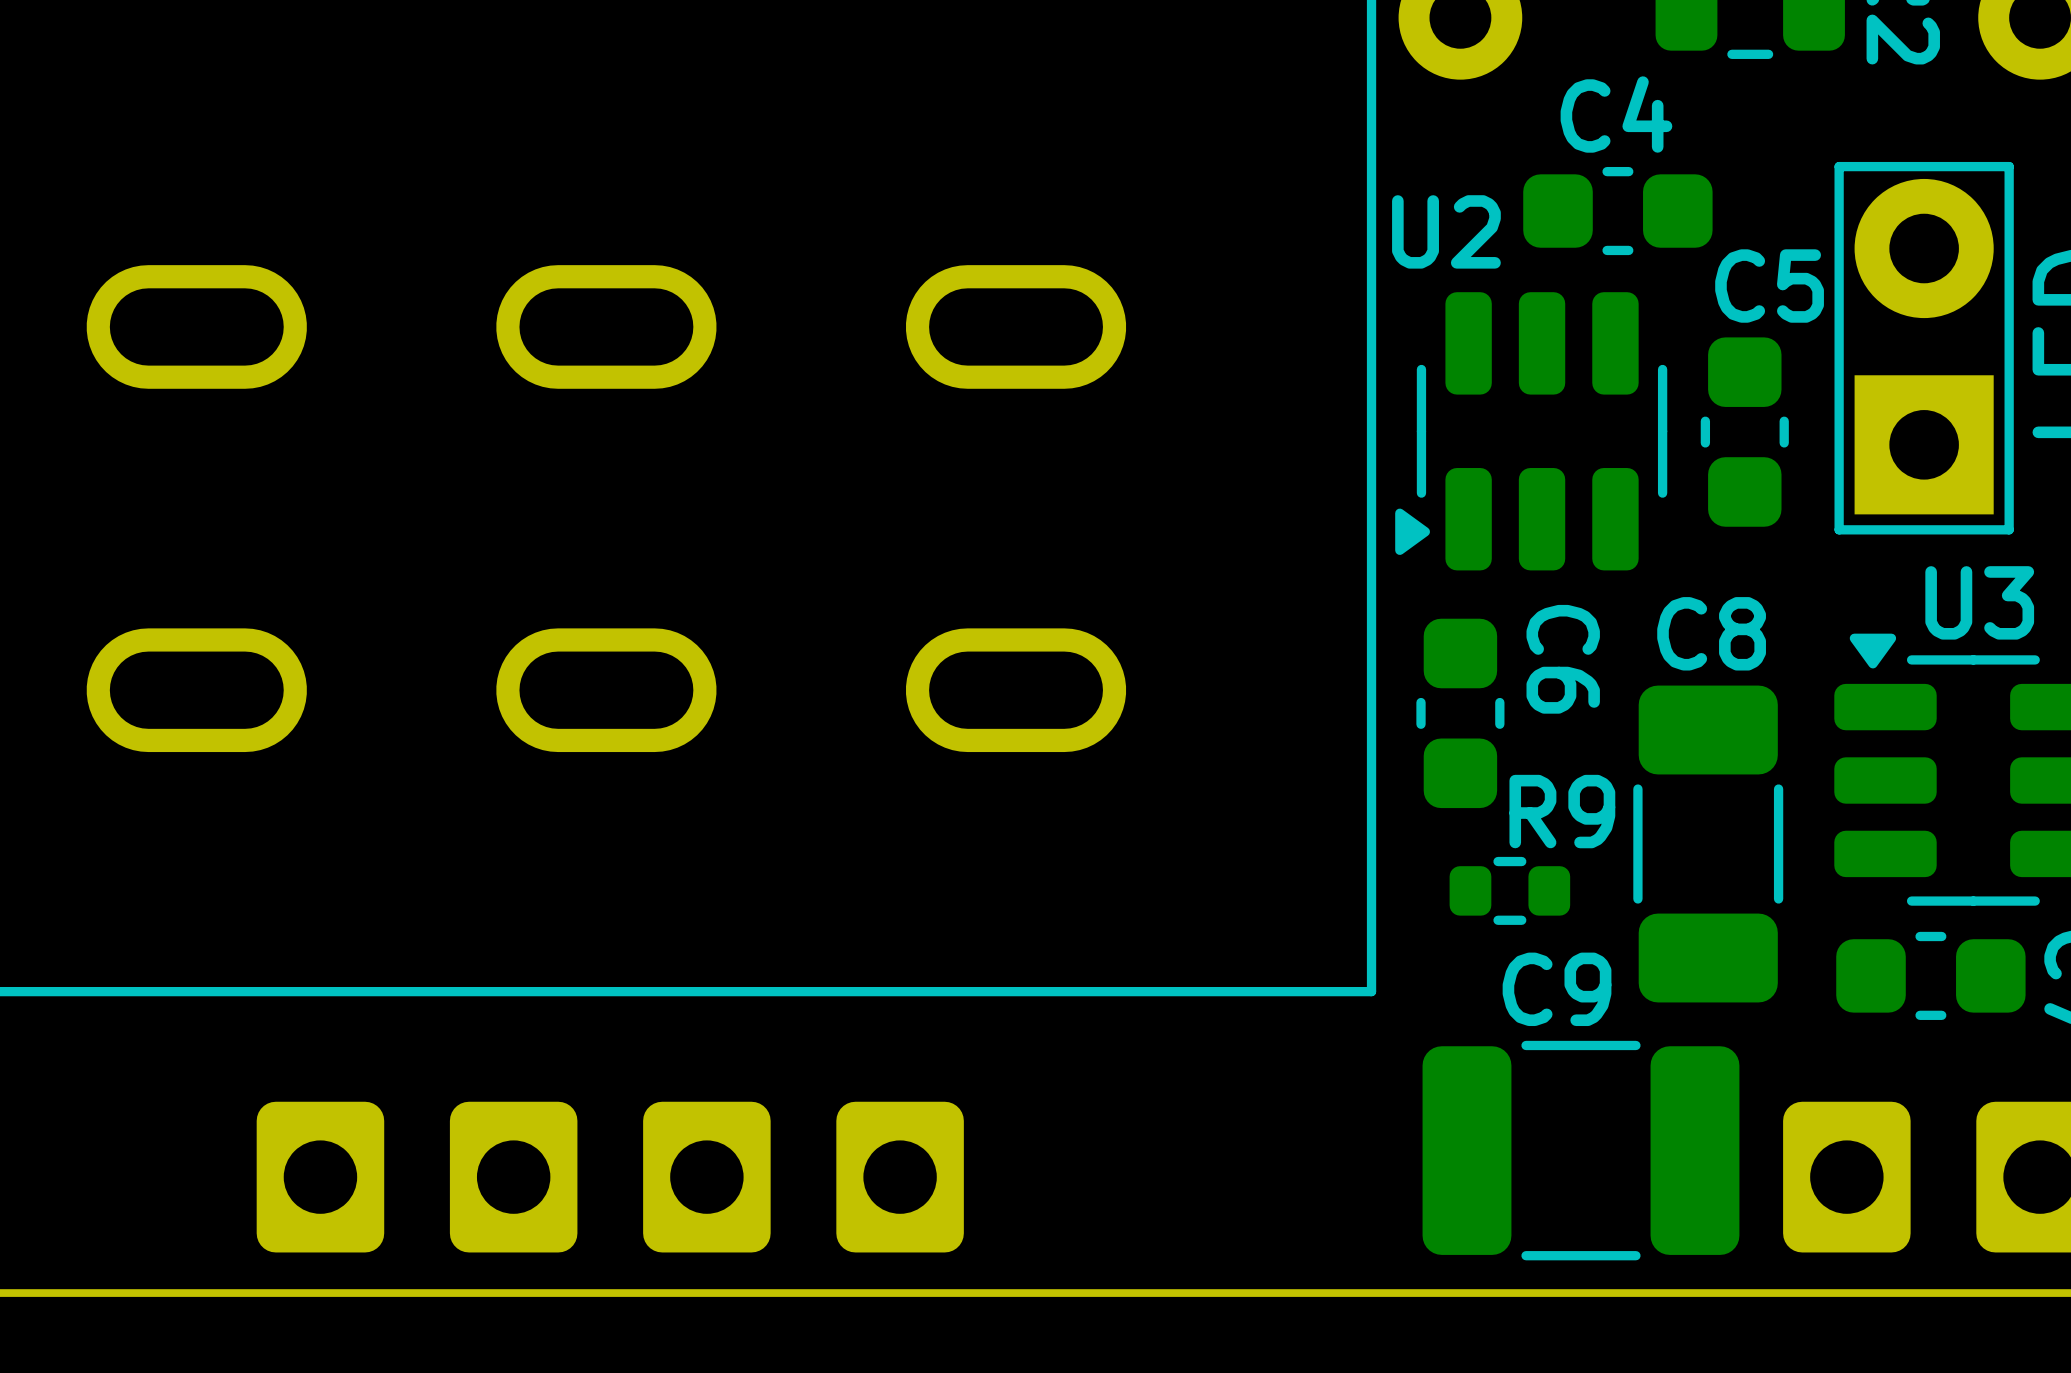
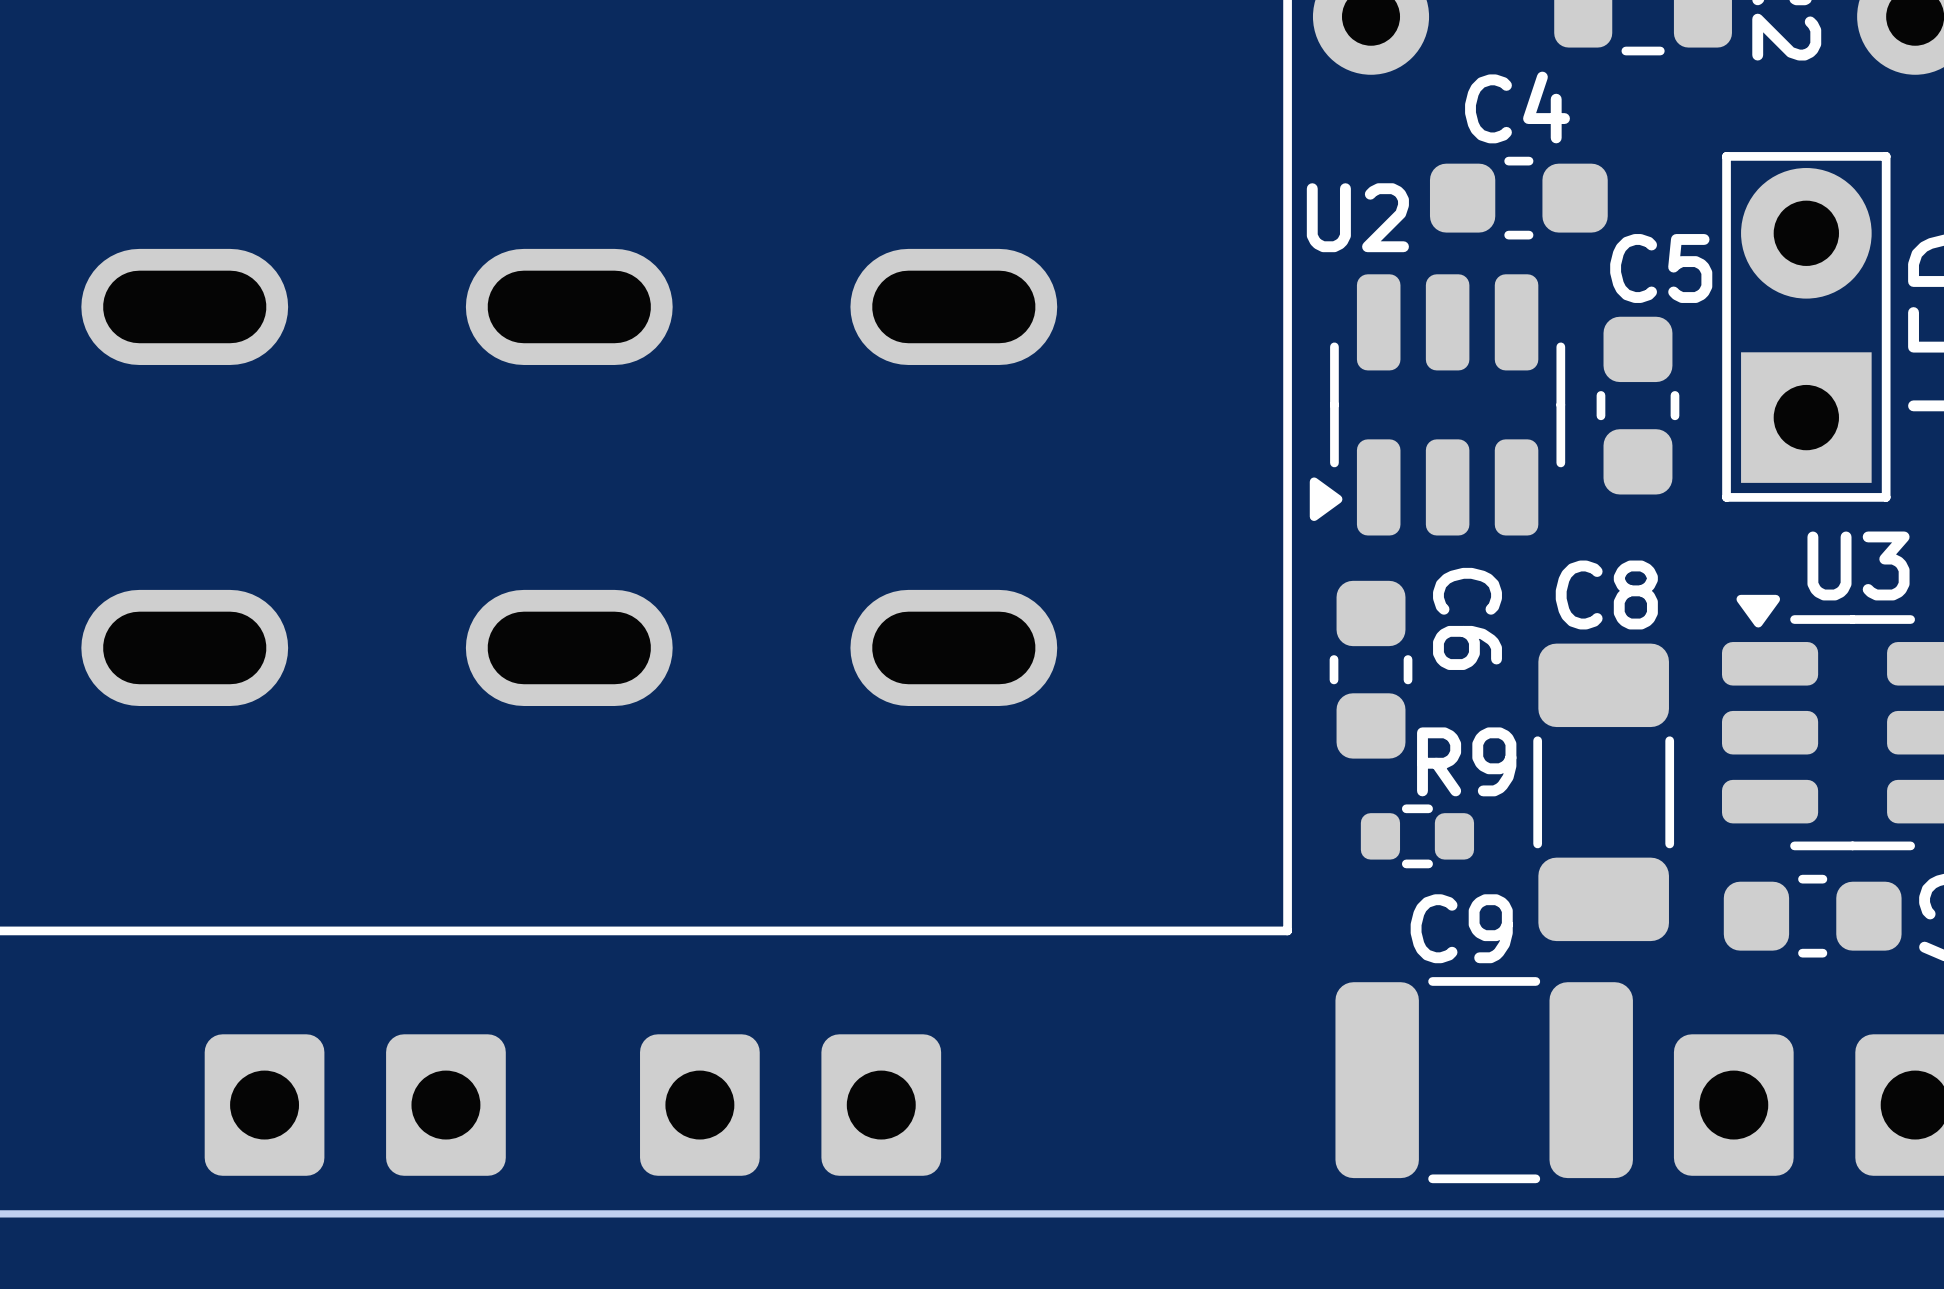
part position: (320, 1177) -> (264, 1105)
part position: (513, 1177) -> (445, 1105)
part position: (706, 1177) -> (699, 1105)
part position: (900, 1177) -> (881, 1105)

